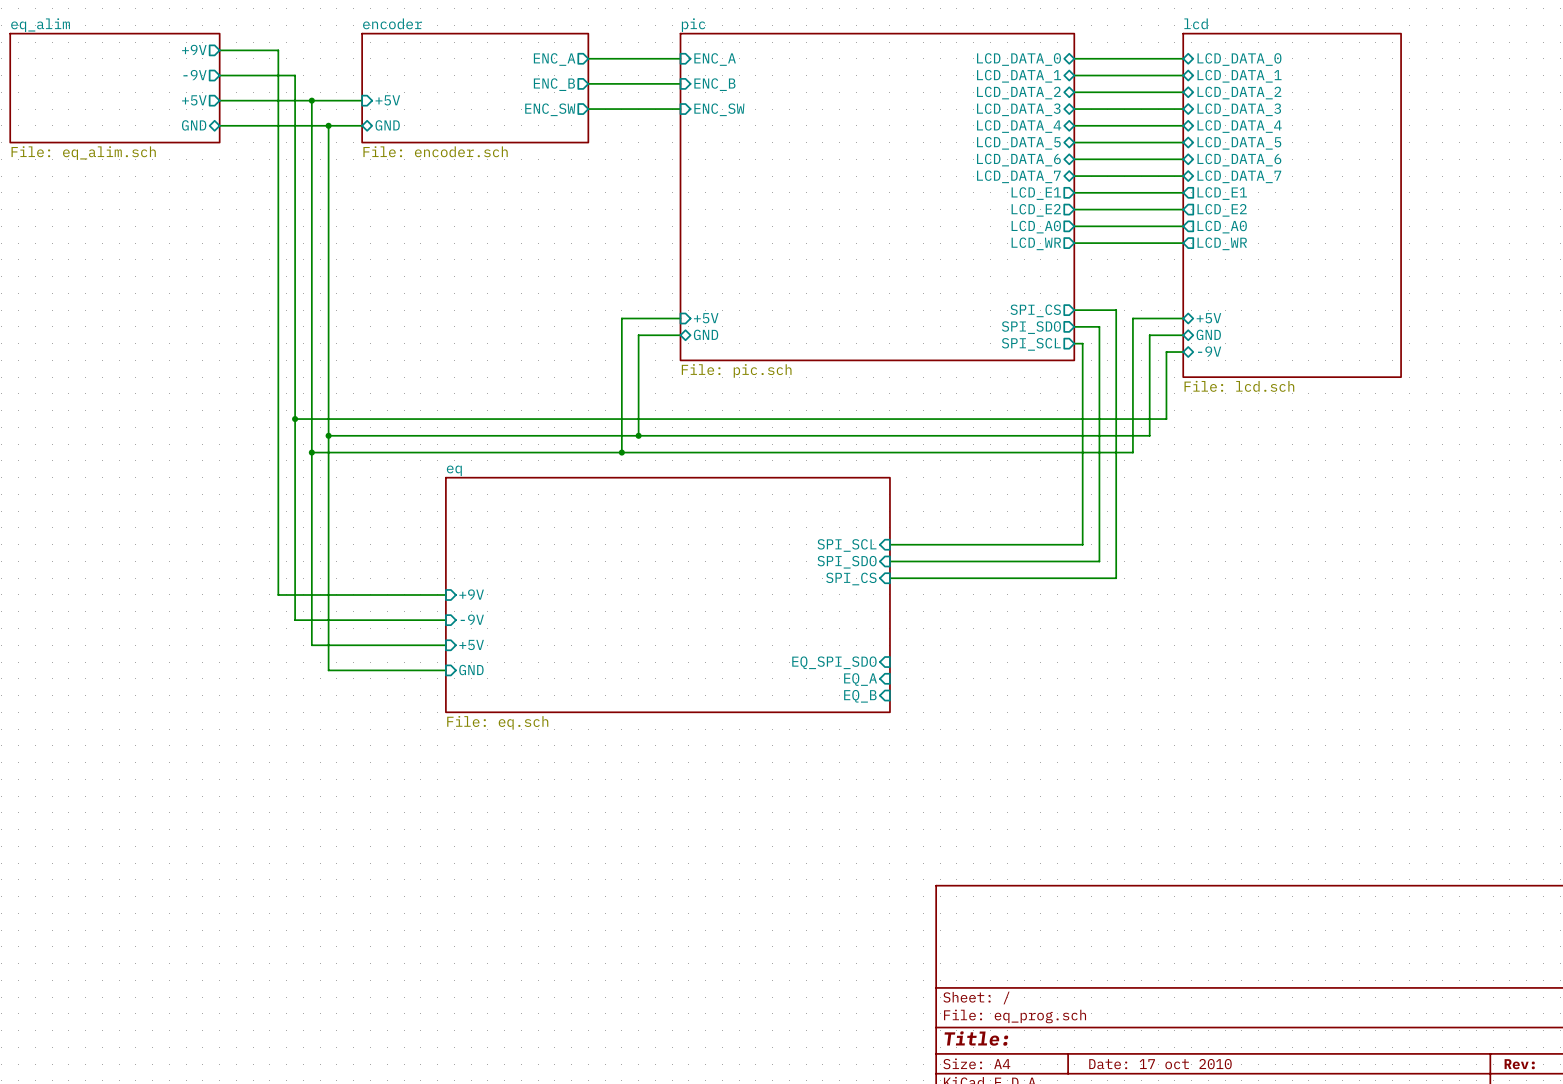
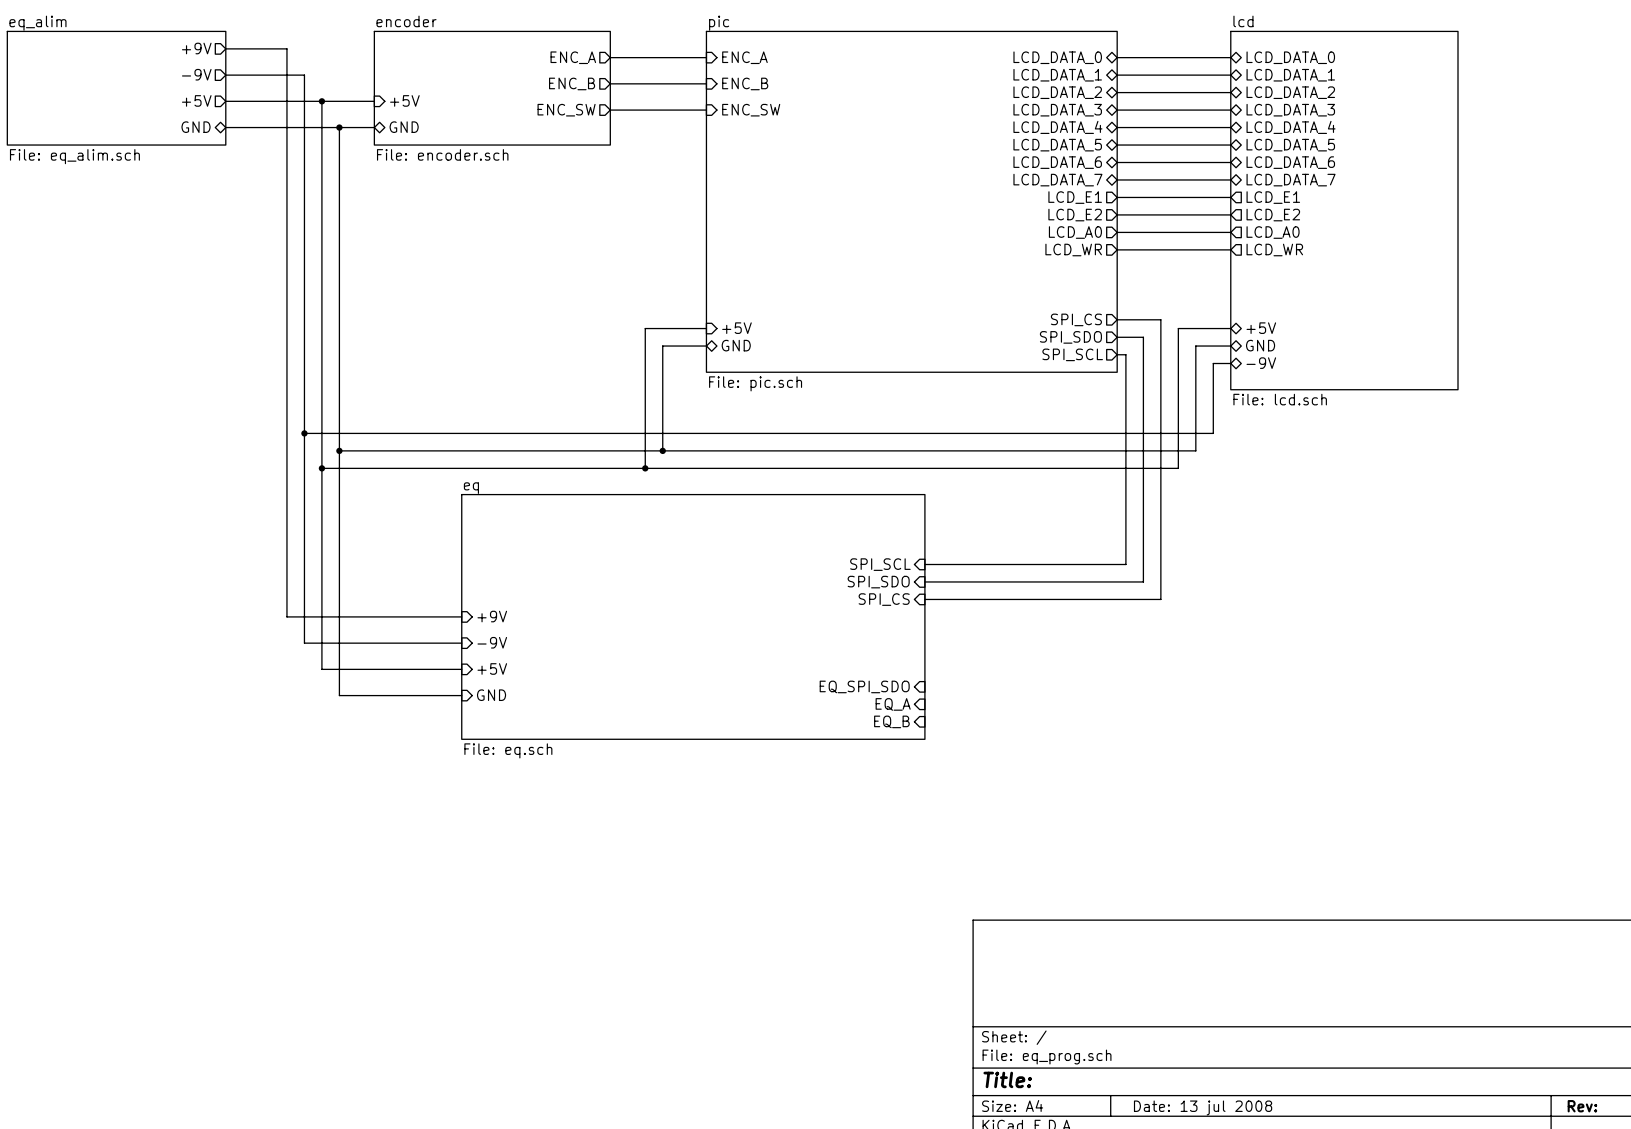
title block: Date: 17 oct 2010 (1160, 1064) -> Date: 13 jul 2008 (1203, 1107)

